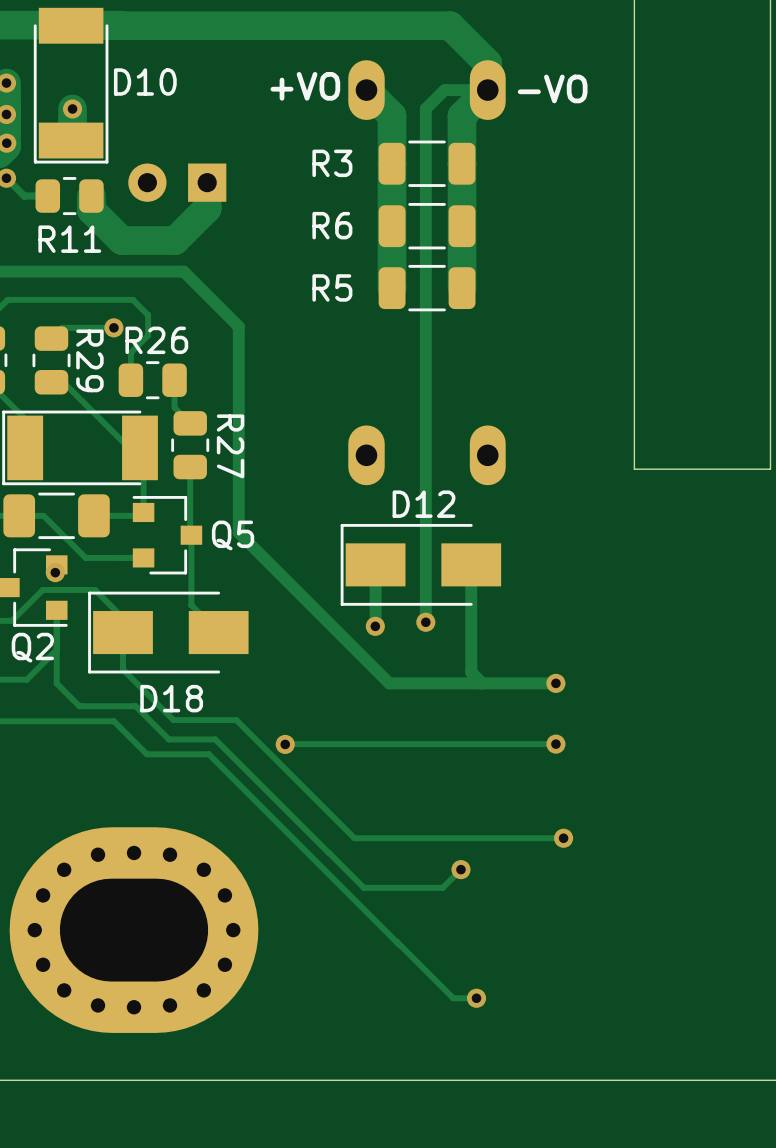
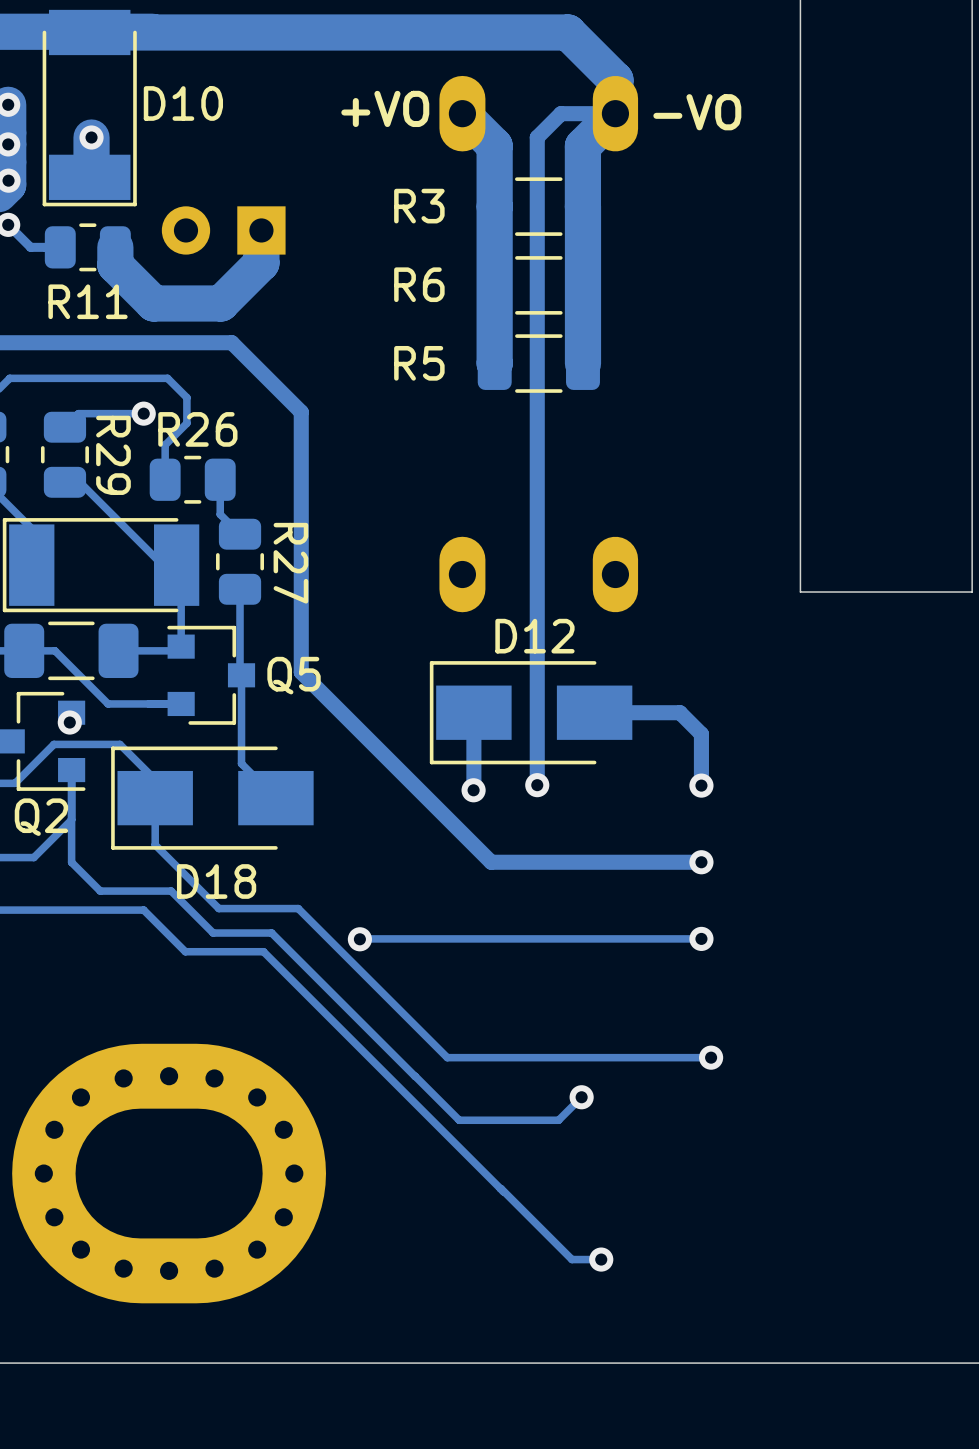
track: none -> (594, 712) (680, 712) (701, 734) (701, 785)
via: none -> (701, 785)
track: (482, 683) (471, 672) (471, 564) (471, 674) (479, 683) -> none

